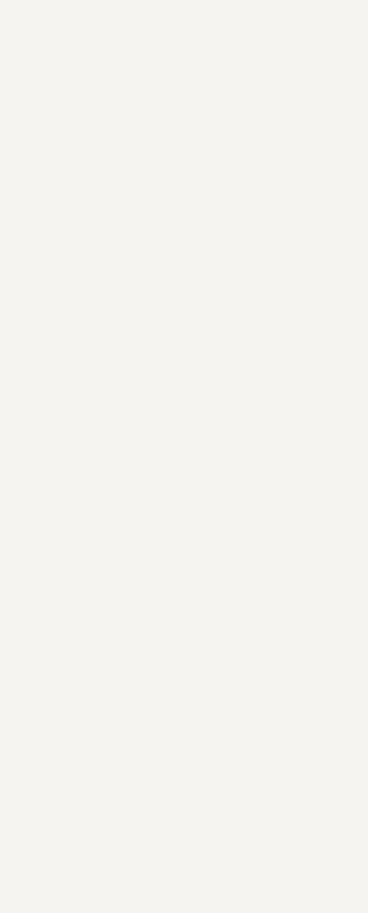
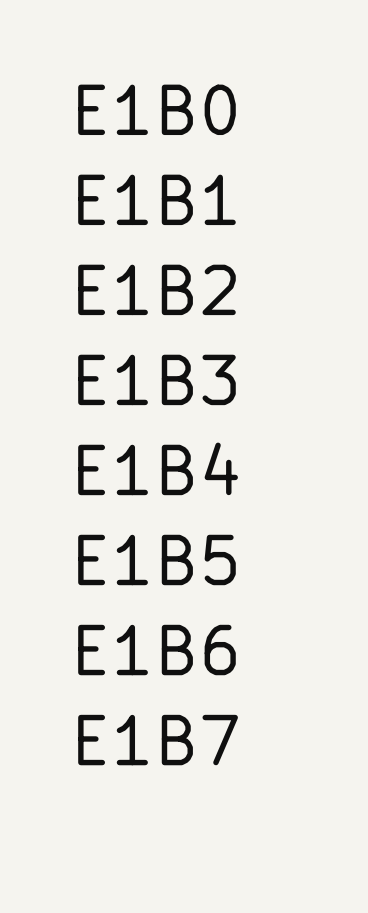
label: none -> E1B0 (156, 109)
label: none -> E1B1 (156, 199)
label: none -> E1B2 (156, 289)
label: none -> E1B3 (156, 379)
label: none -> E1B4 (158, 468)
label: none -> E1B5 (156, 559)
label: none -> E1B6 (156, 650)
label: none -> E1B7 (158, 740)

